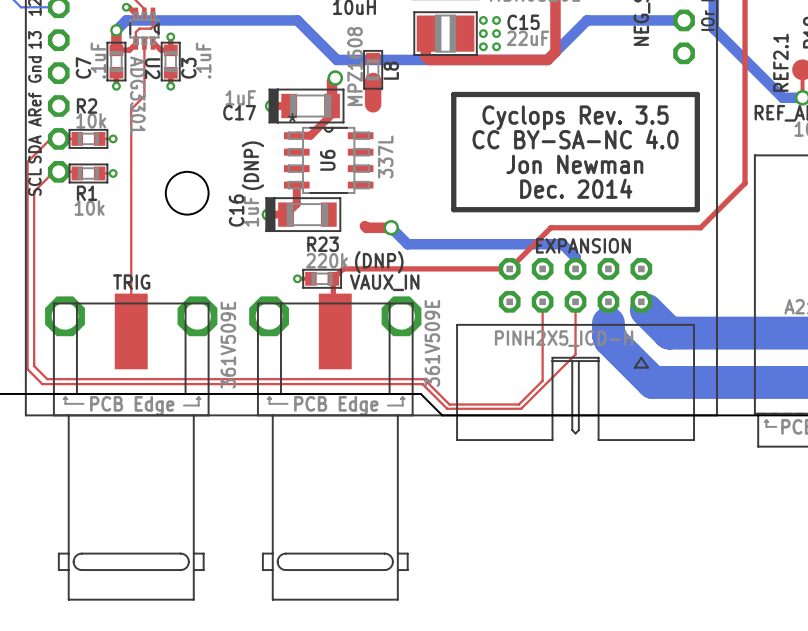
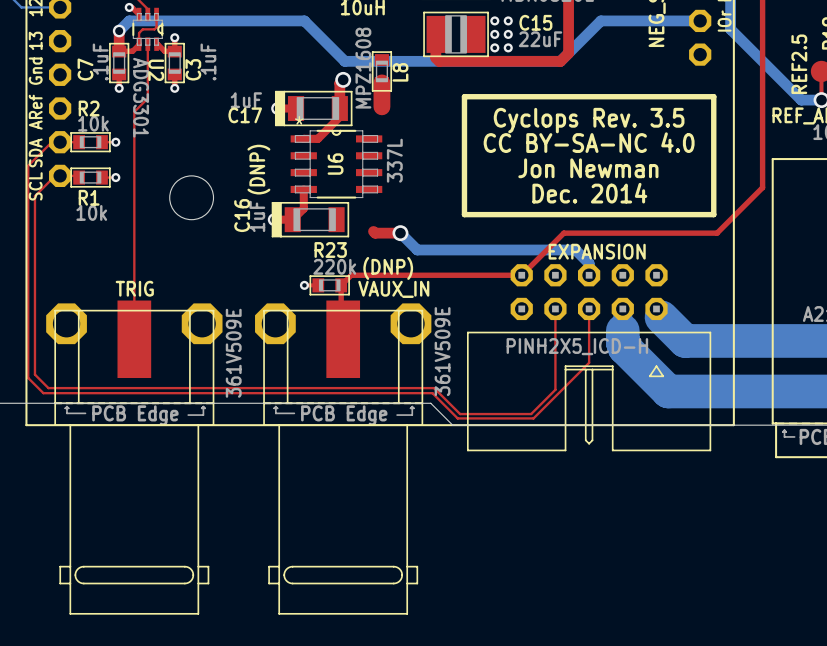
REF2.1 name: REF2.1 (780, 62) -> REF2.5 (799, 64)

